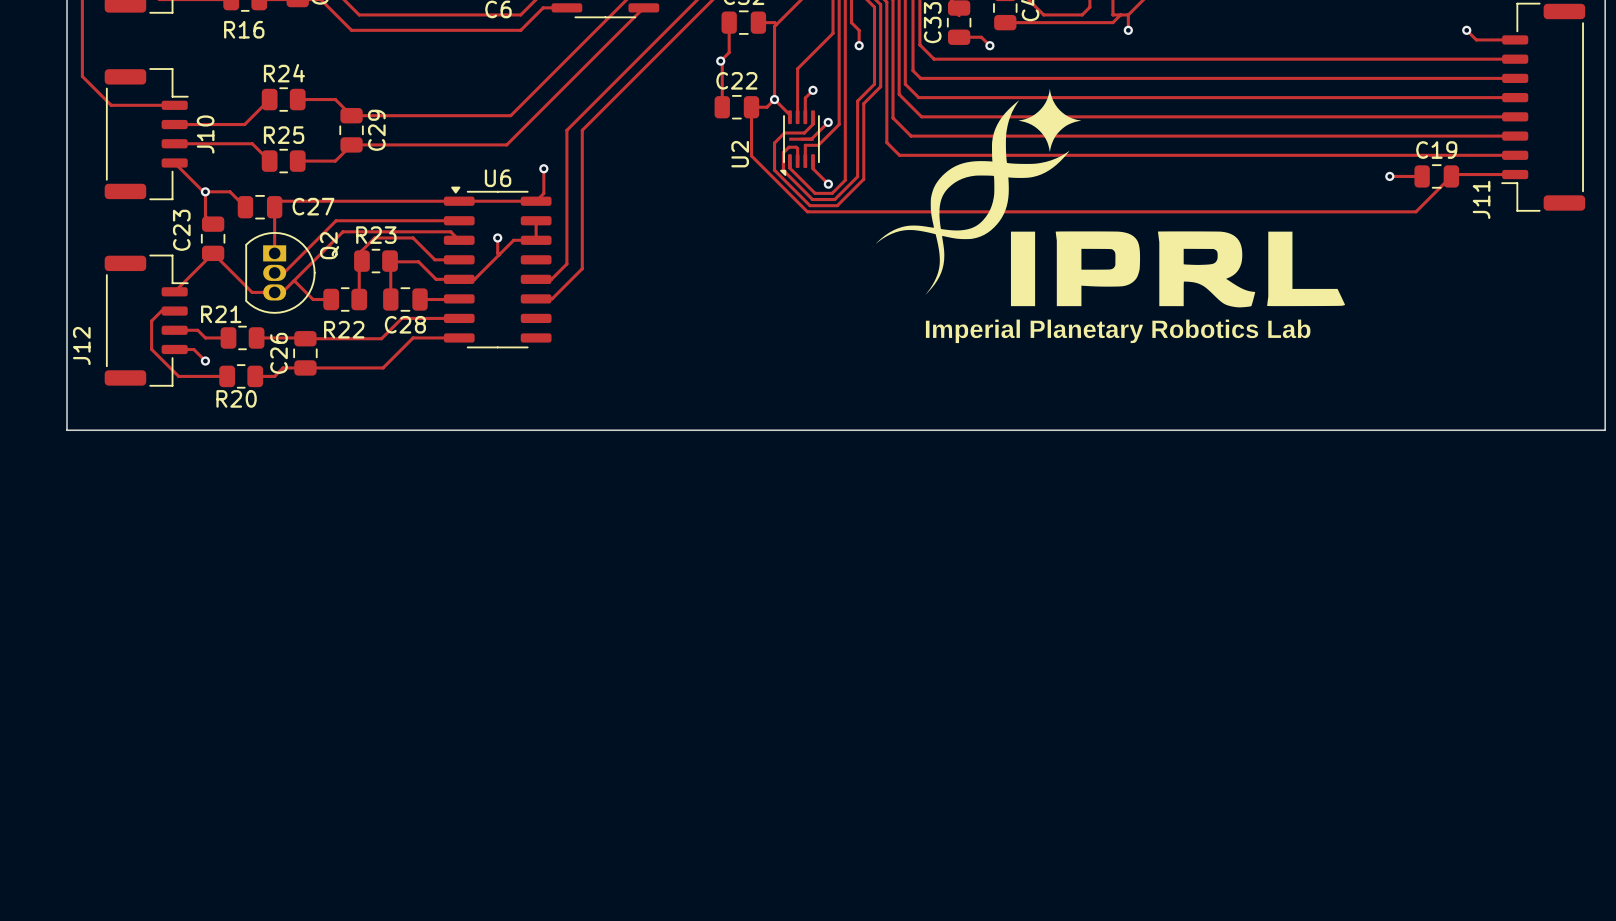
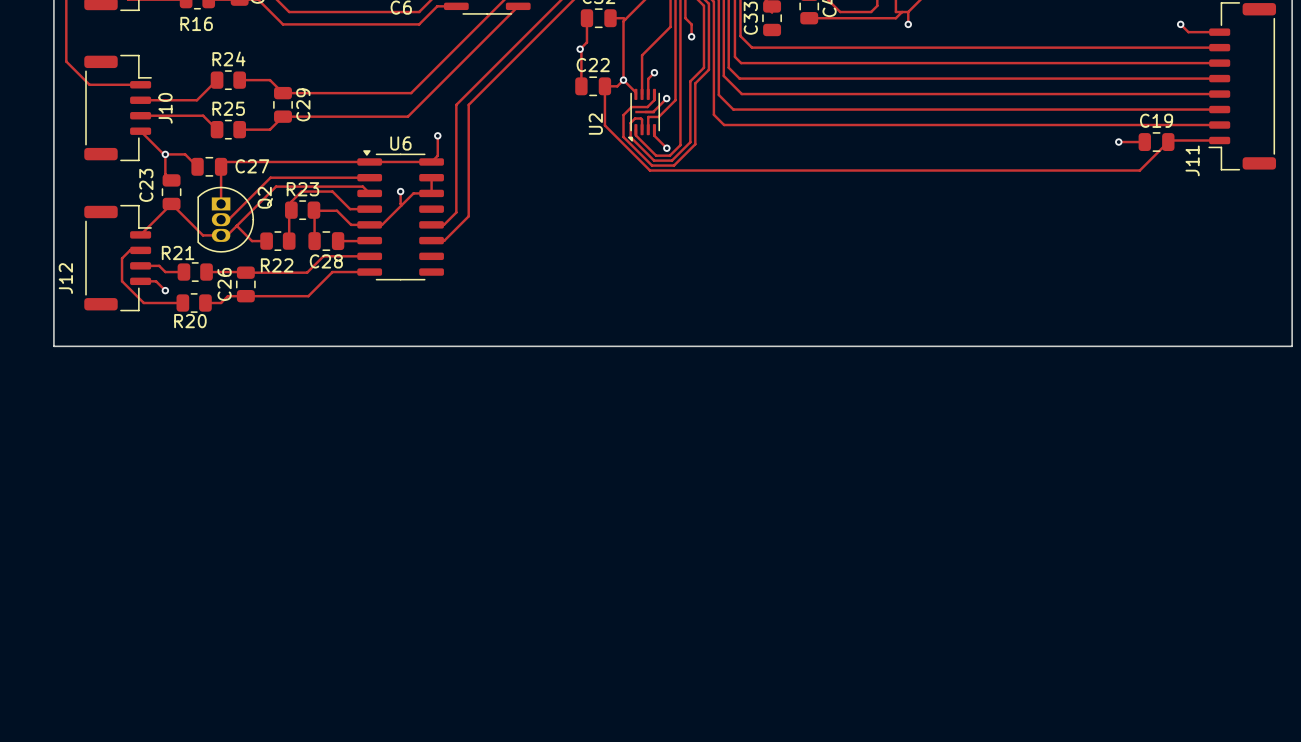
track: (959, 37) (981, 37) (989, 45) -> none
via: (989, 45) -> none
drawing: [872, 89, 1345, 344] -> none

